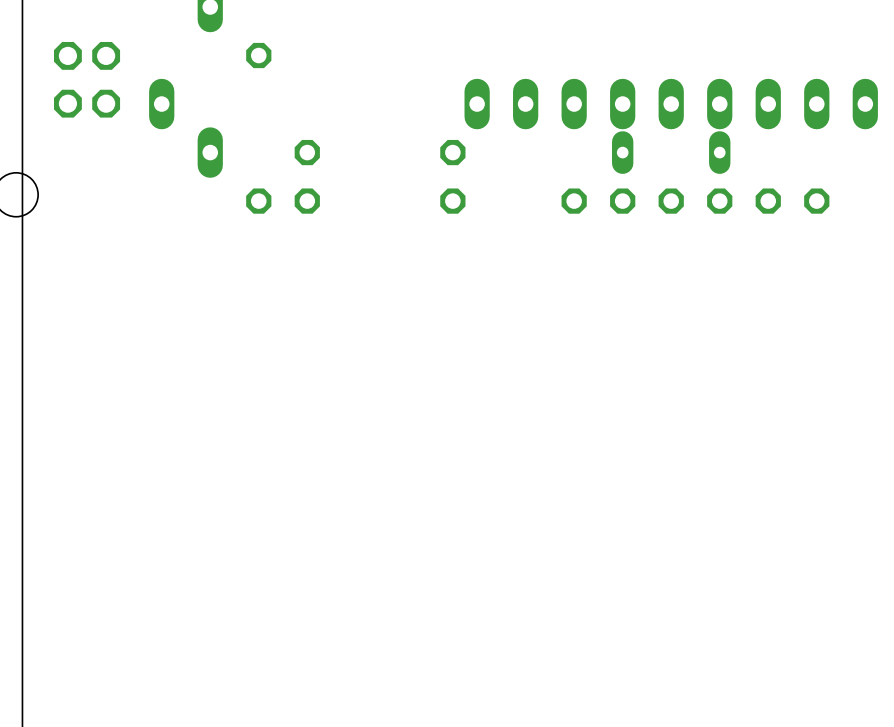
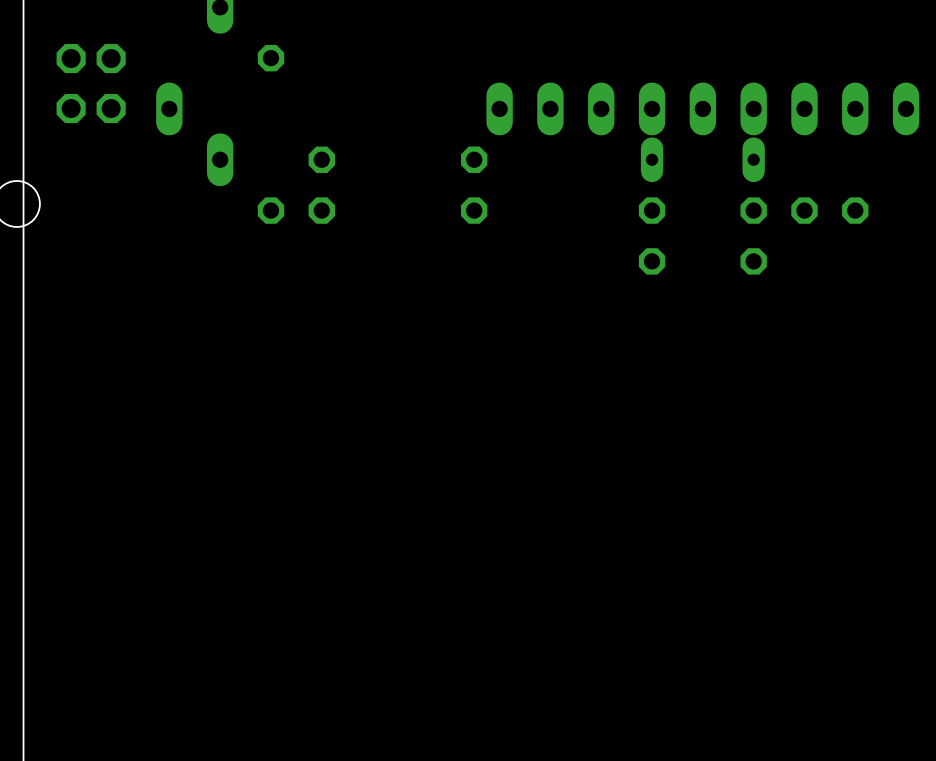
part rotation: 0° (598, 201) -> 90° clockwise (652, 235)
part rotation: 0° (695, 201) -> 90° clockwise (753, 235)

